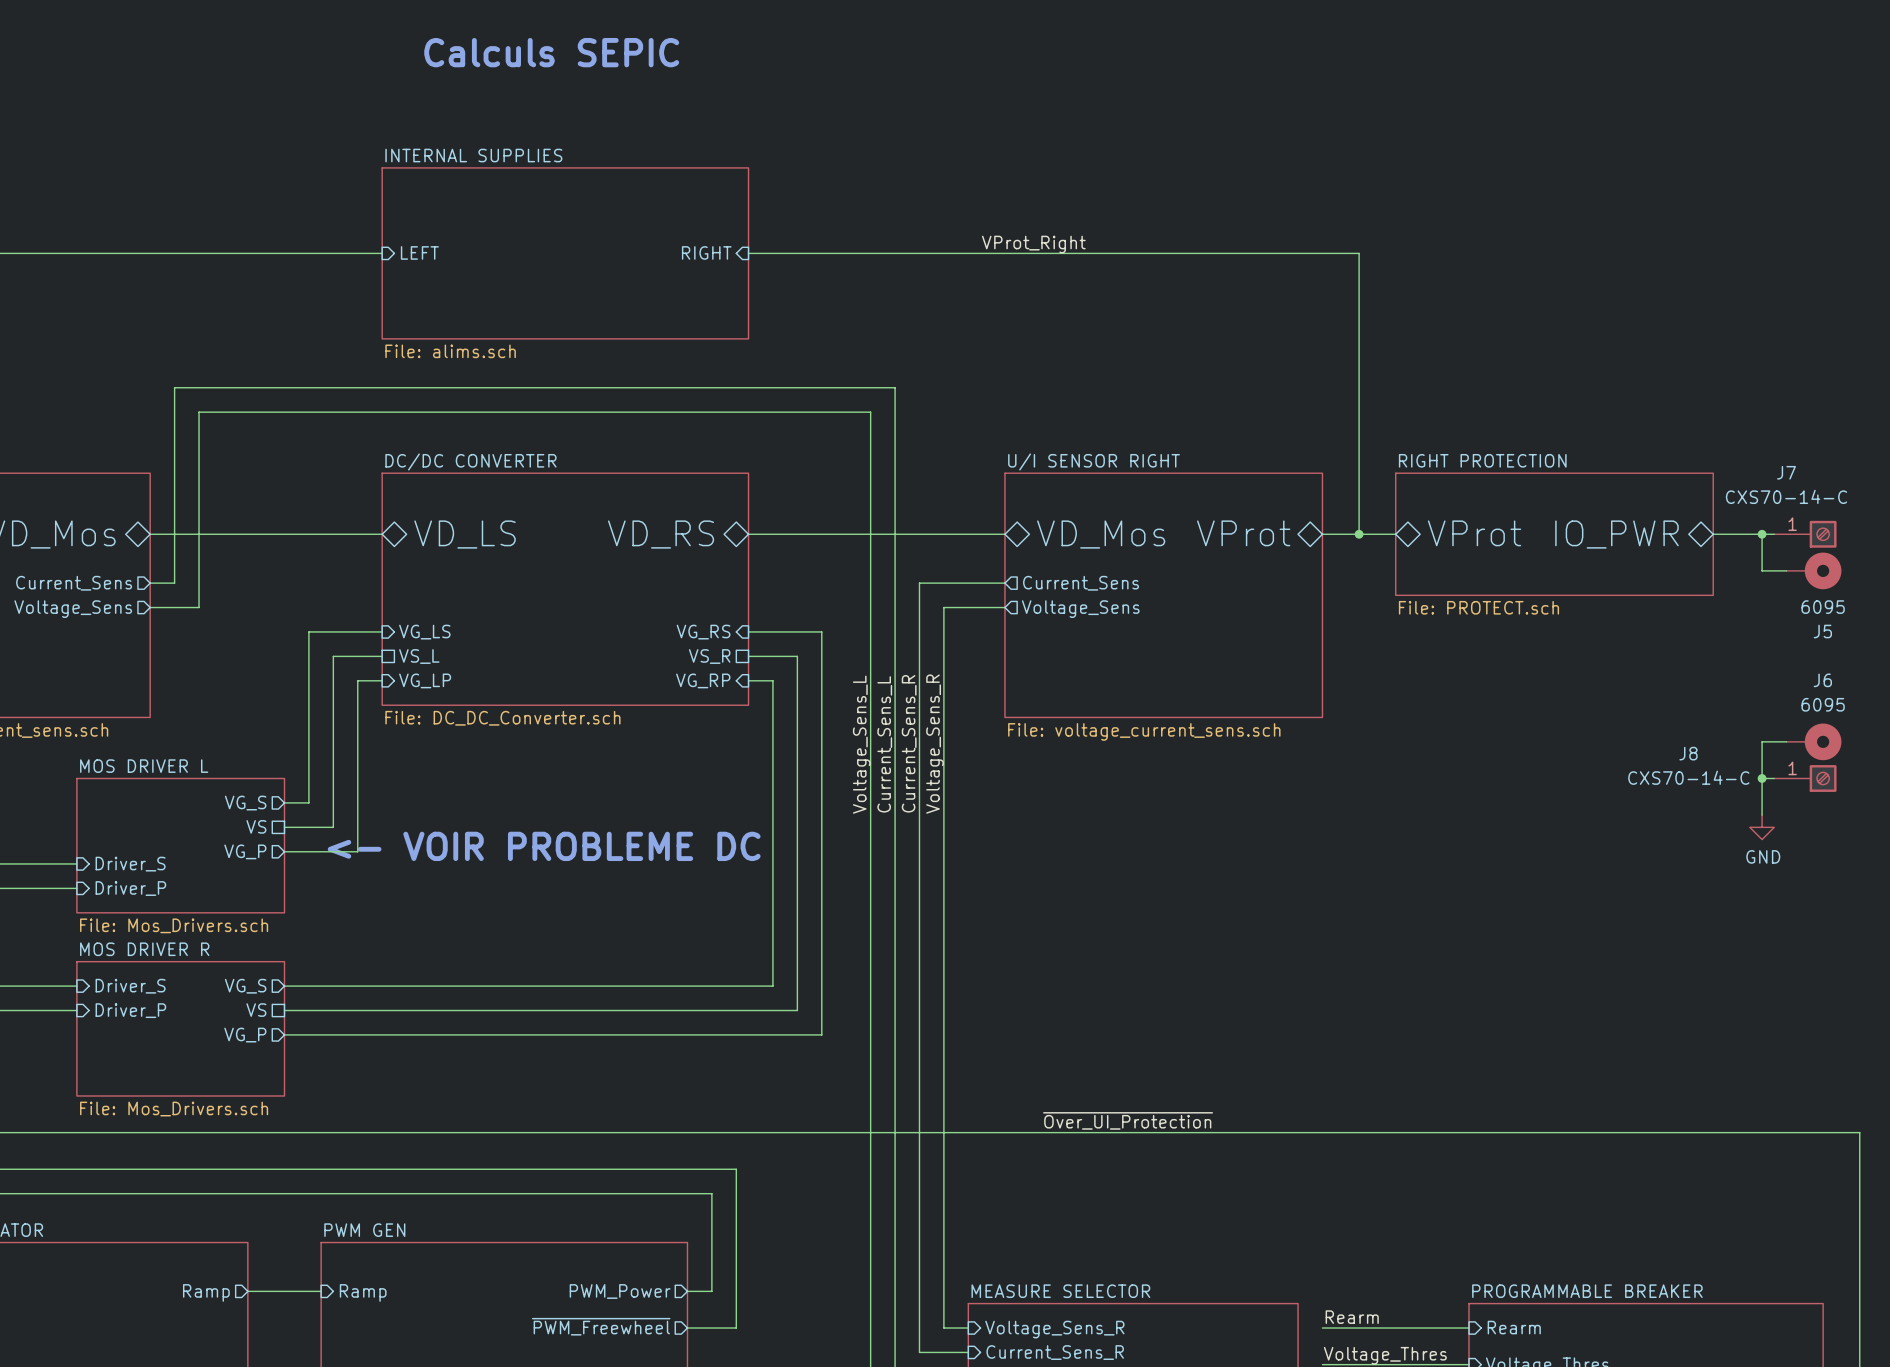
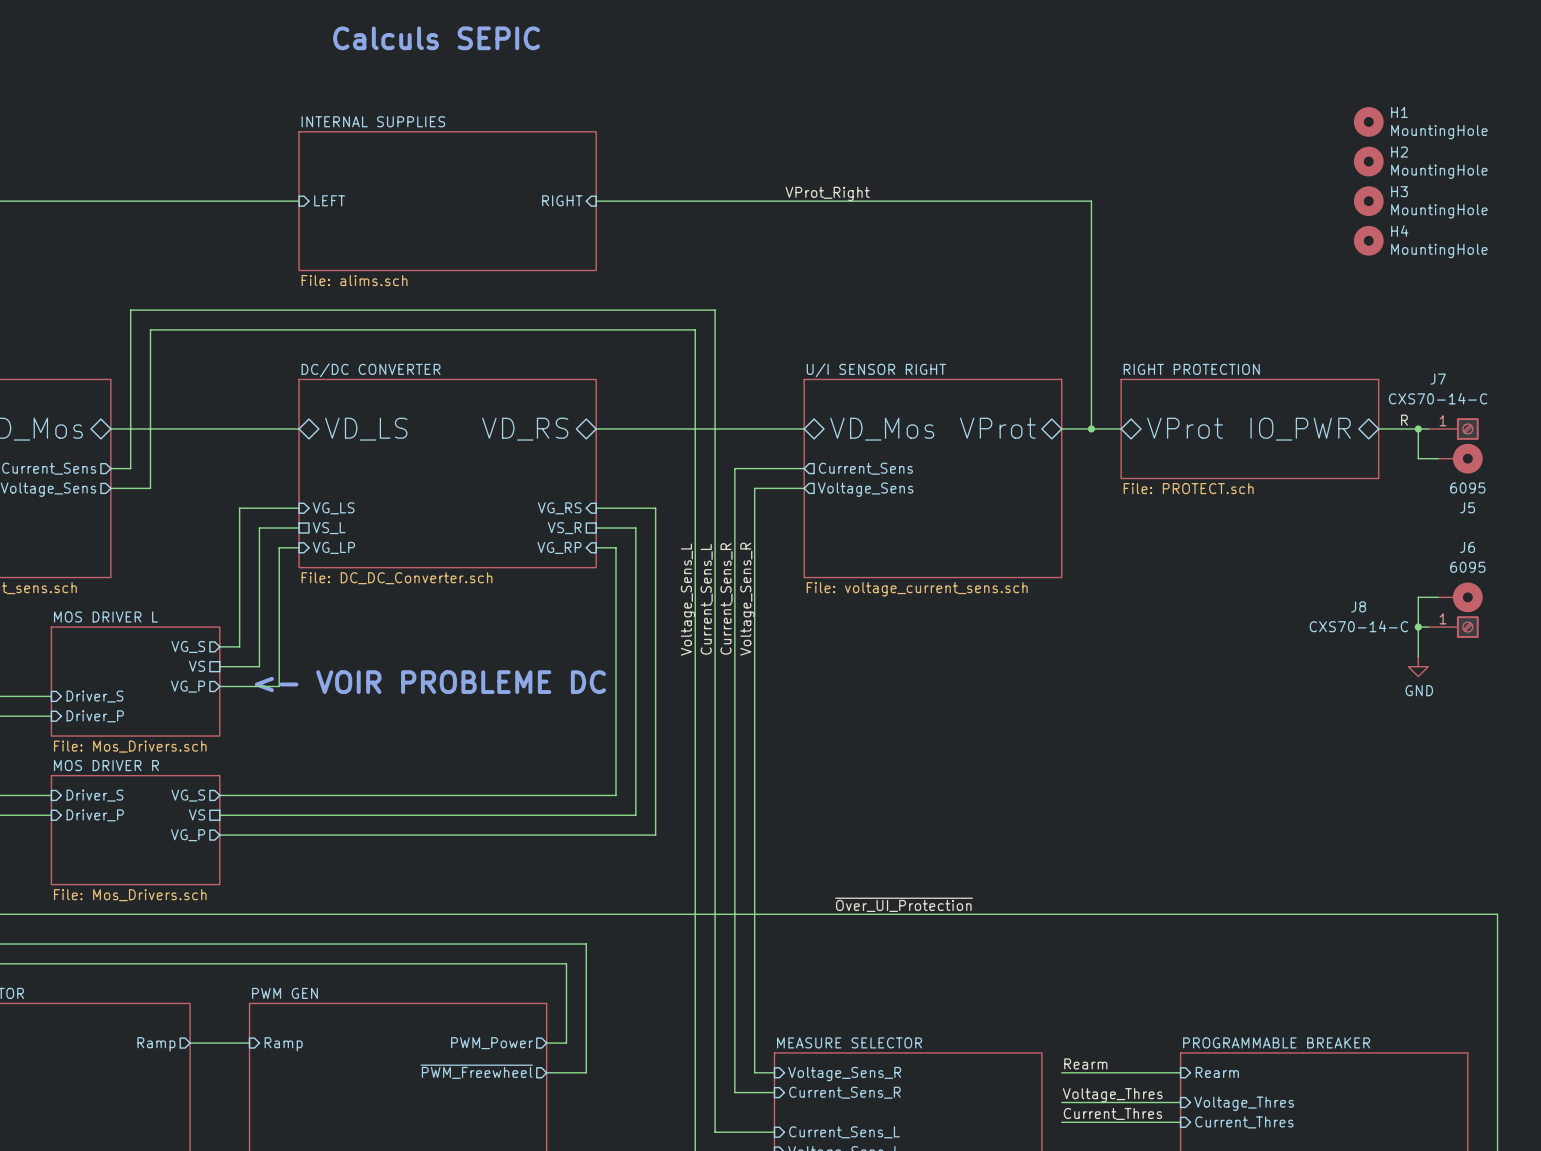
H1: none -> MountingHole (1368, 121)
H2: none -> MountingHole (1368, 161)
H3: none -> MountingHole (1368, 201)
H4: none -> MountingHole (1368, 240)
label: none -> R (1404, 420)

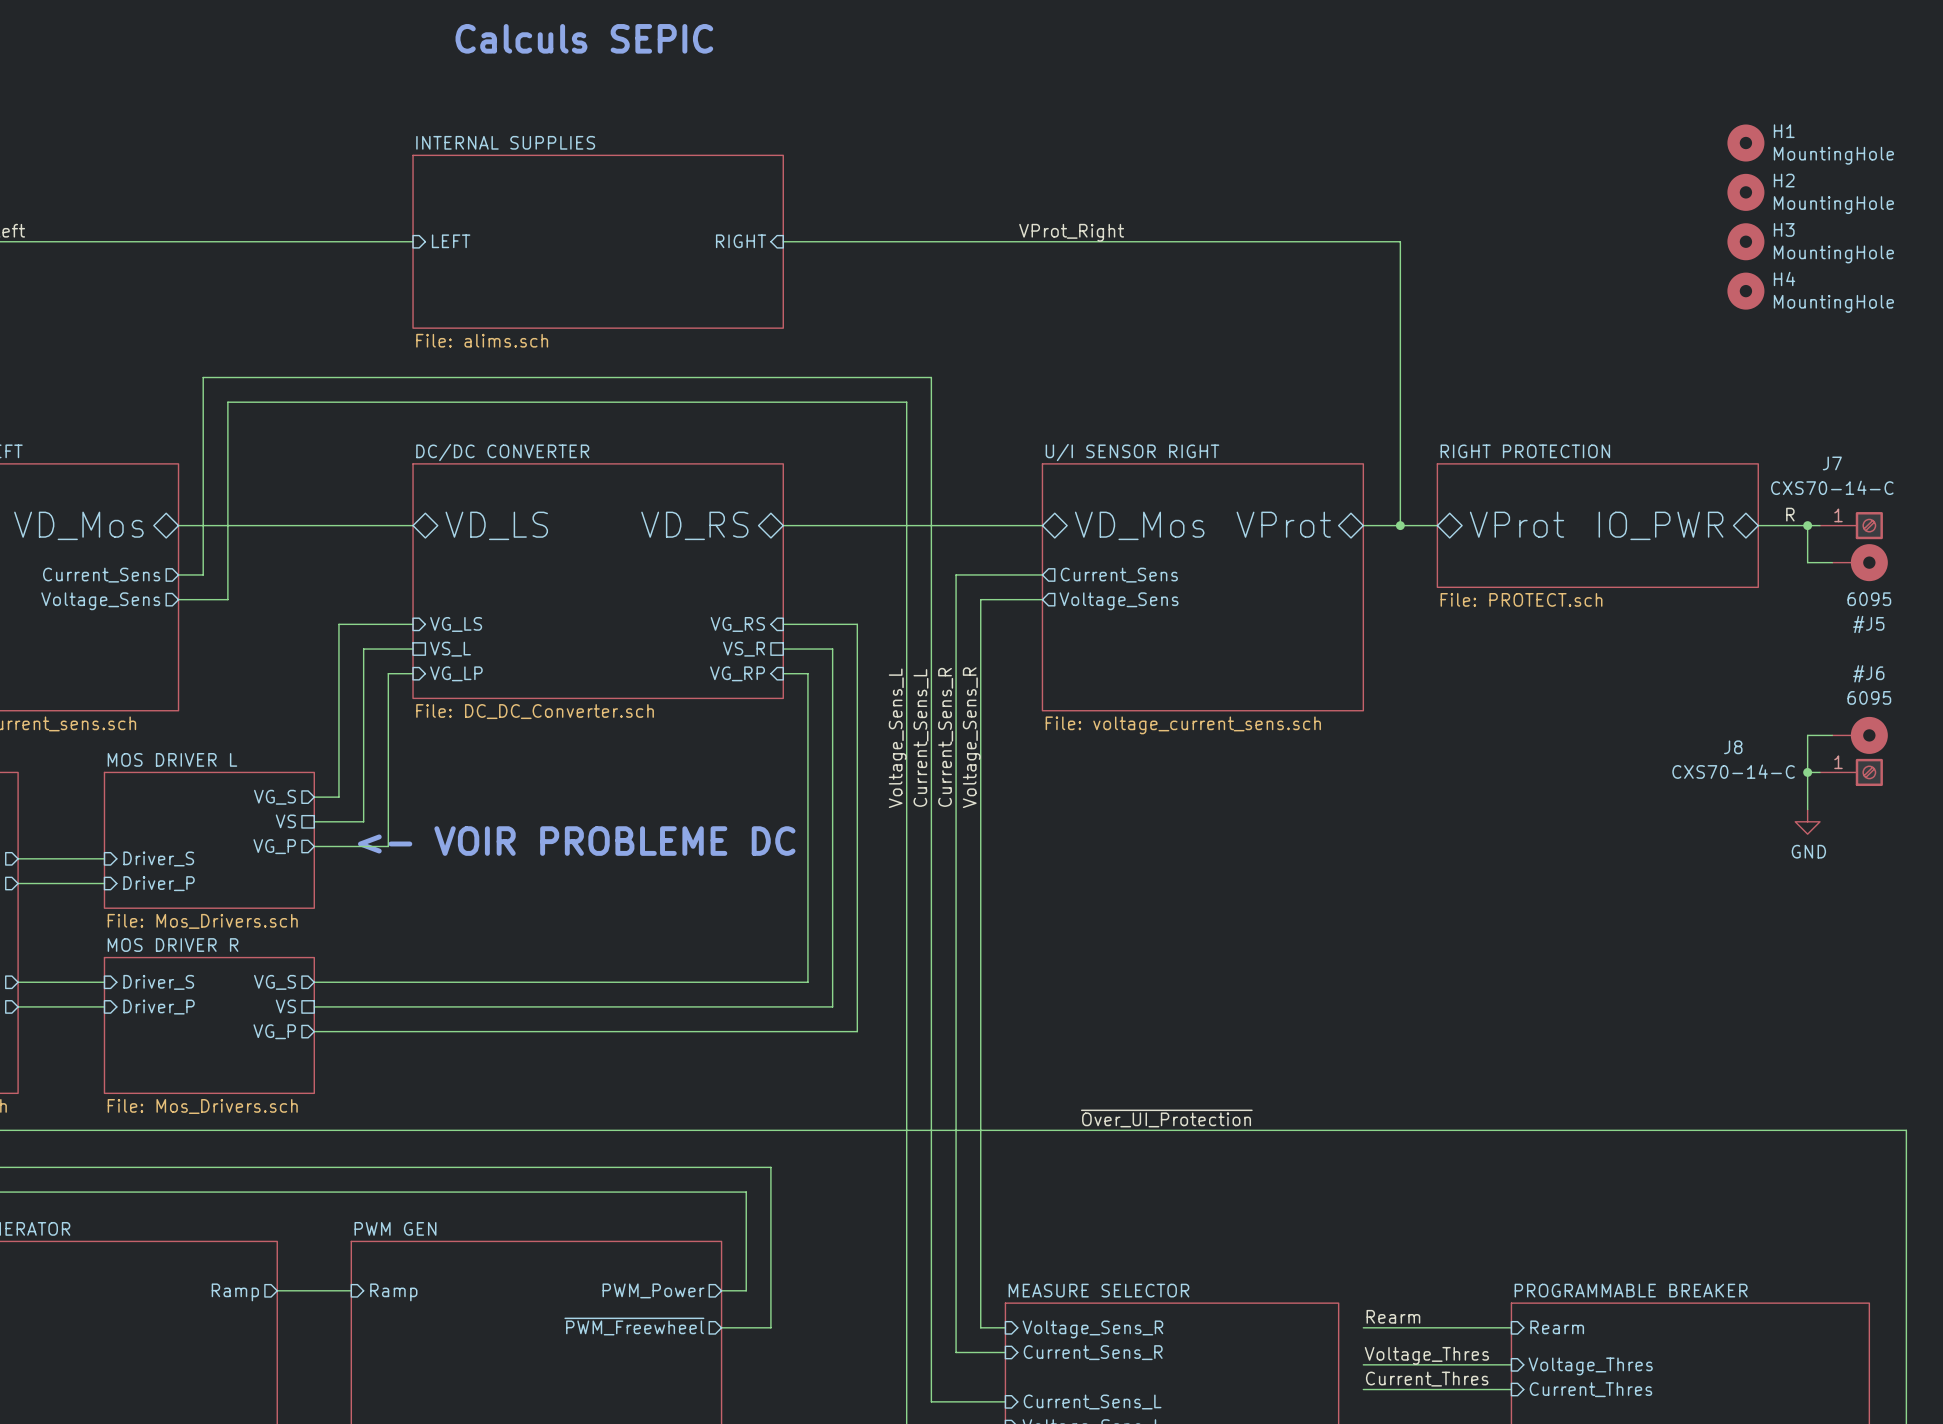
J5: 6095 (1460, 458) -> none
#J5: none -> 6095 (1860, 562)
J6: 6095 (1460, 597) -> none
#J6: none -> 6095 (1860, 735)

